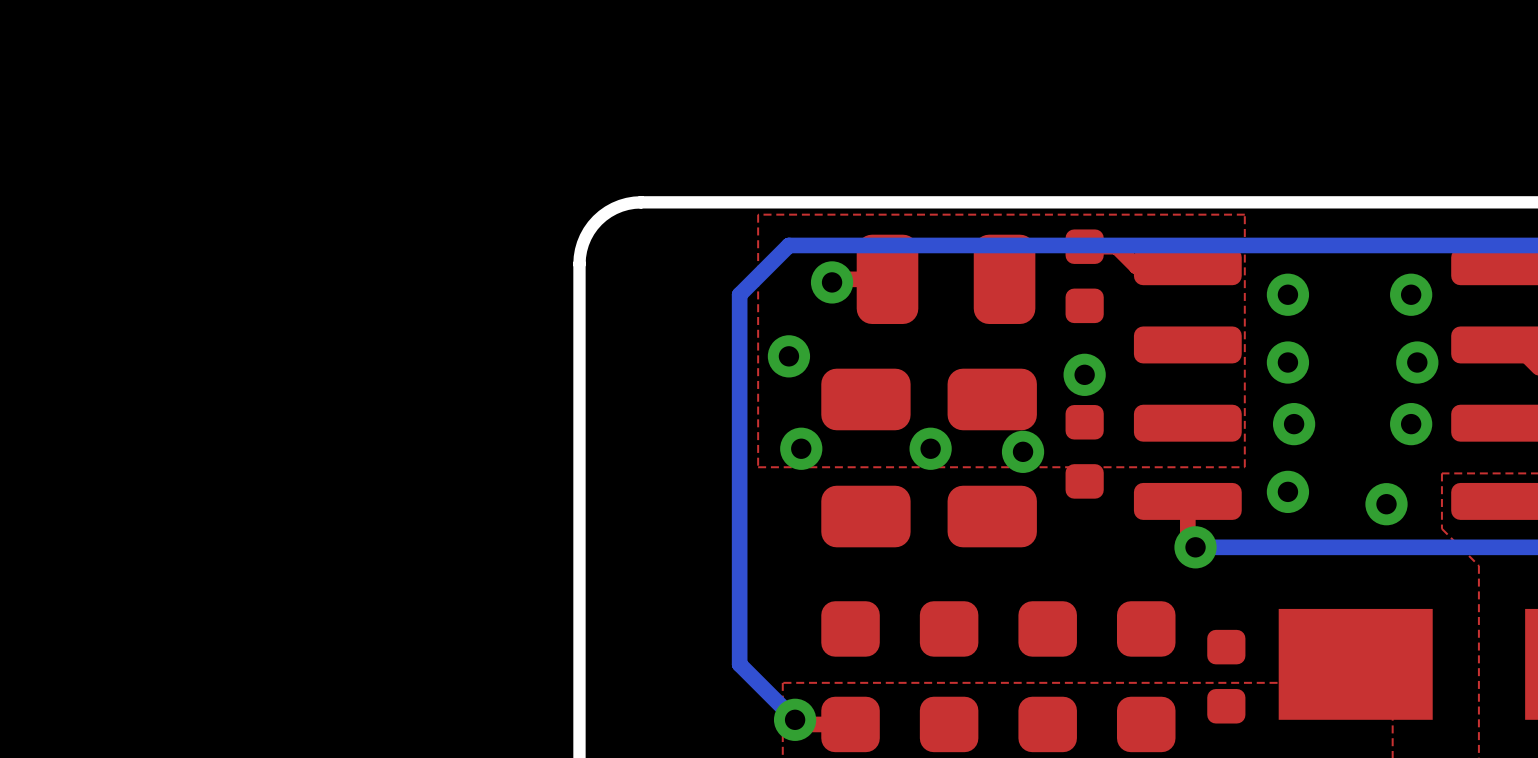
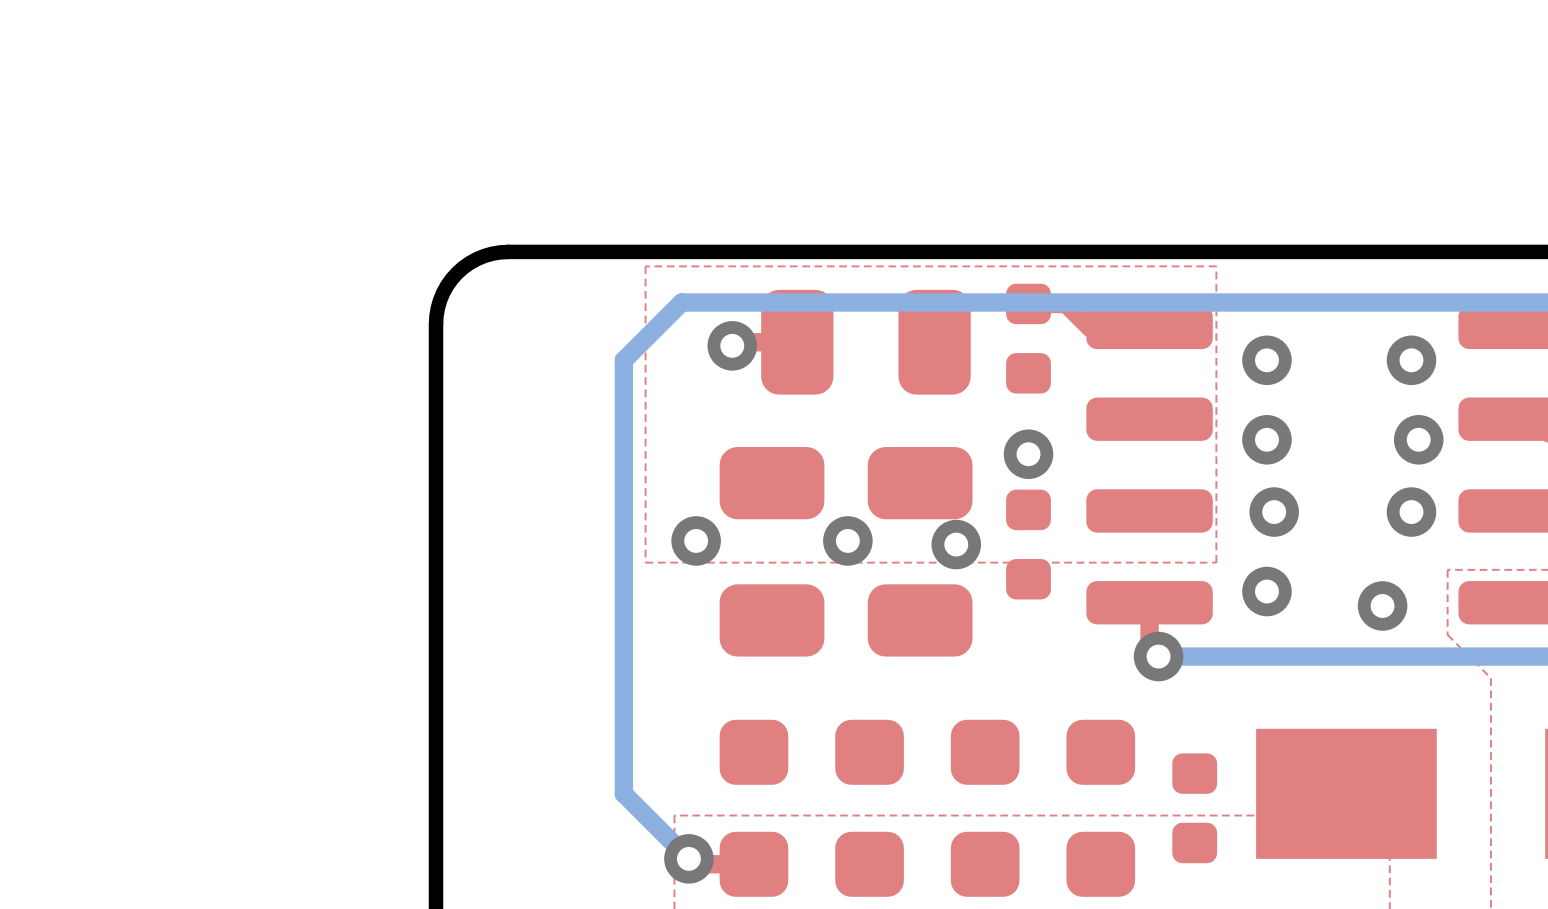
via: (788, 356) -> none

